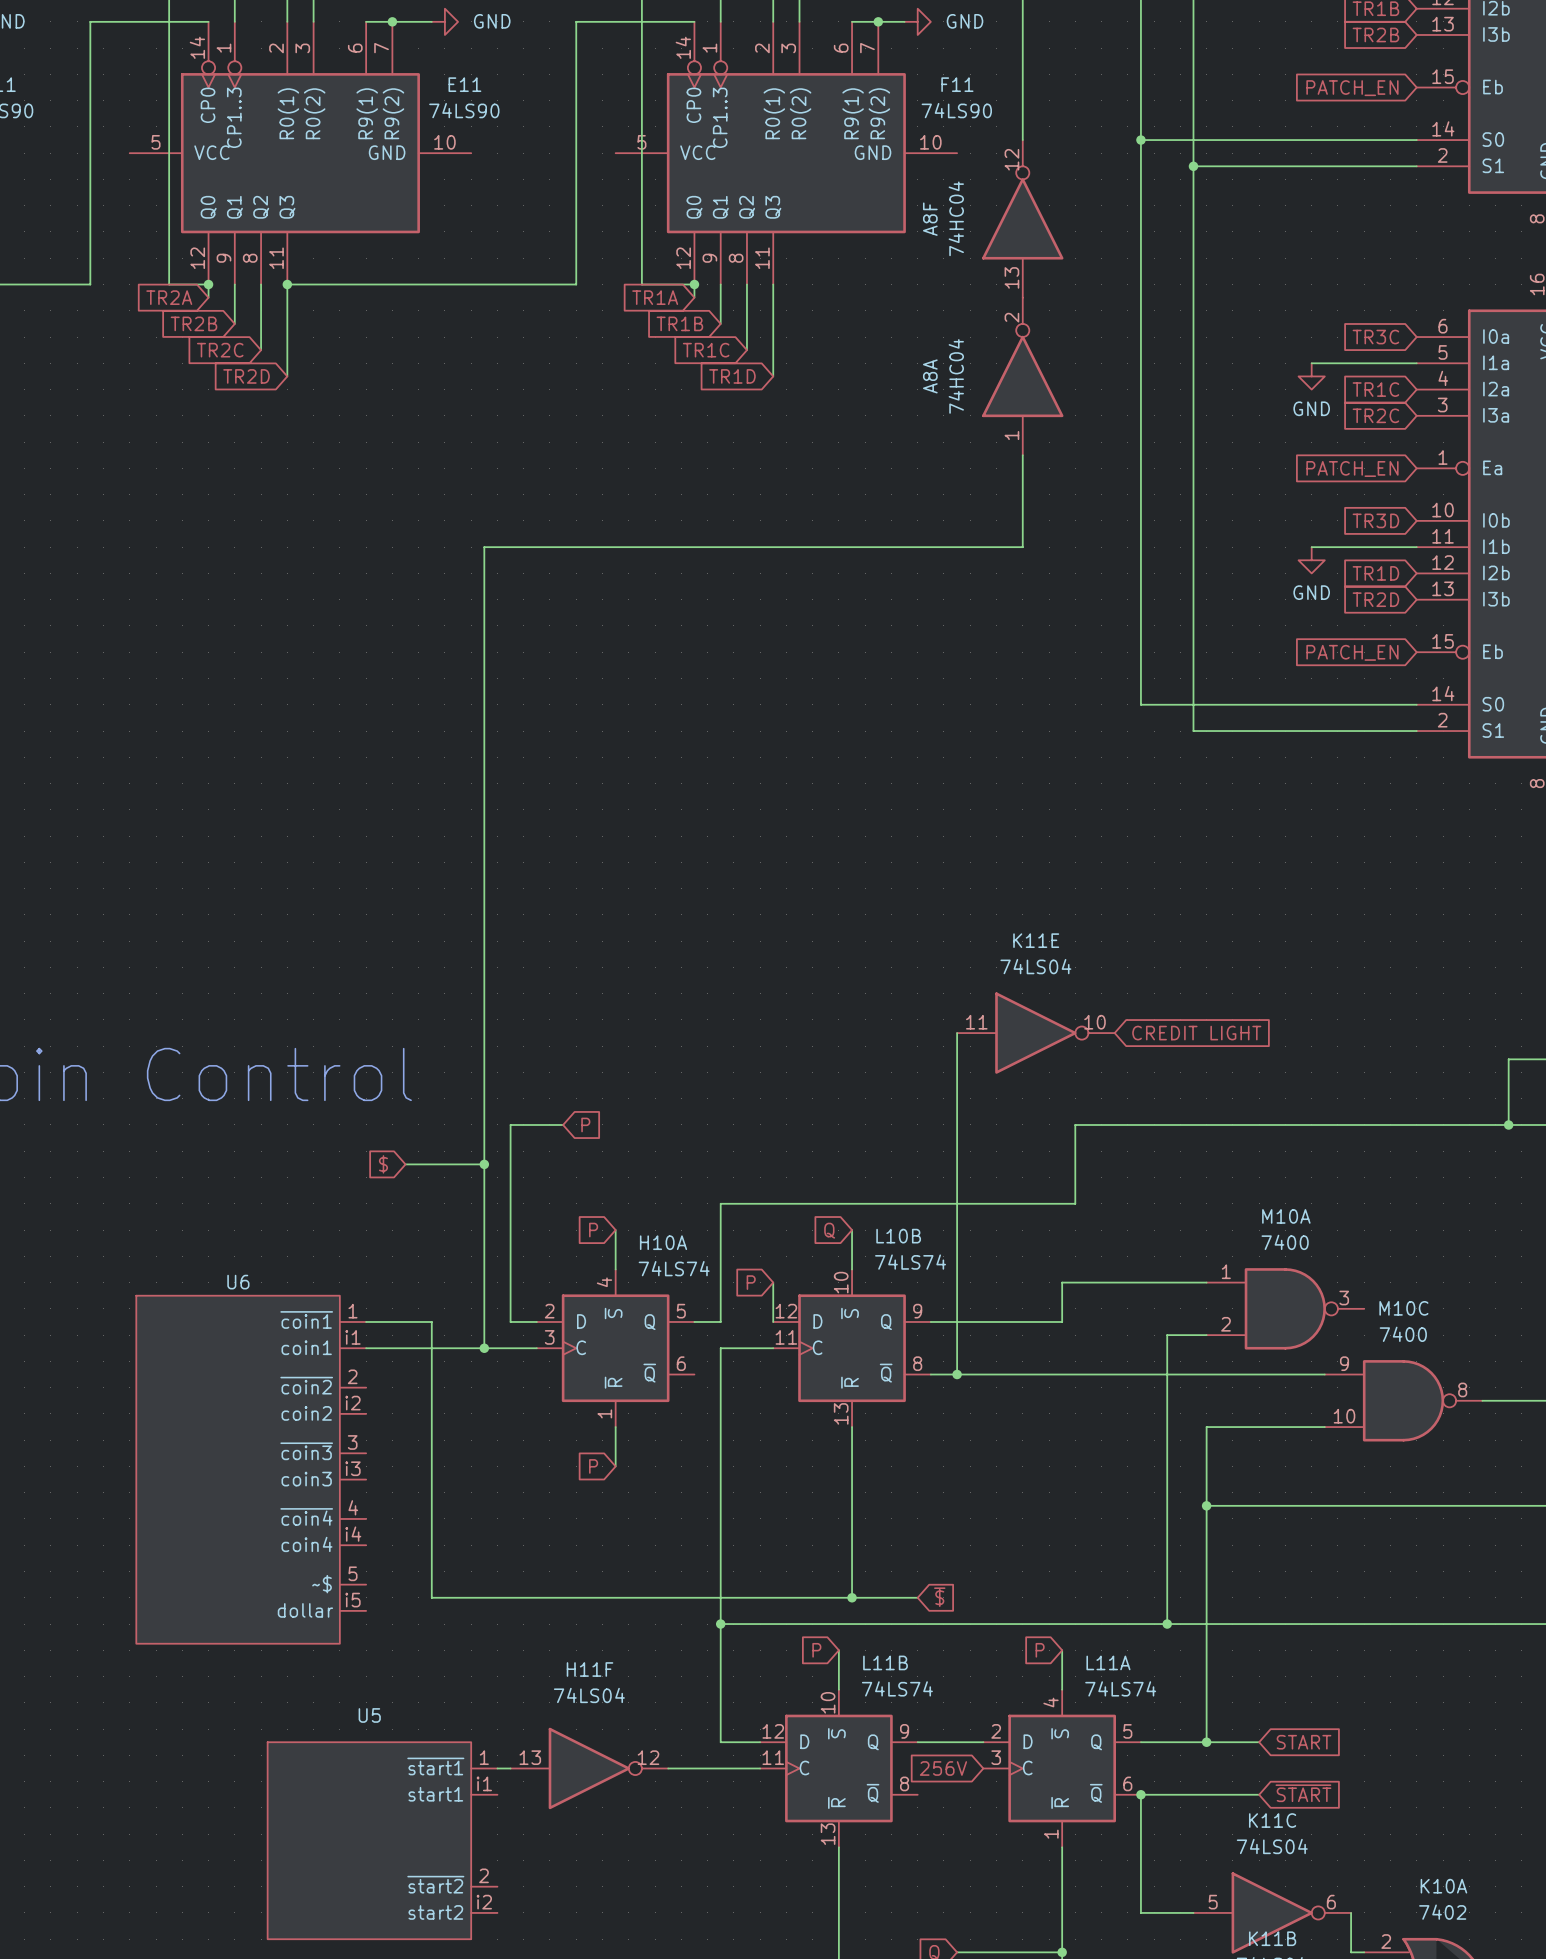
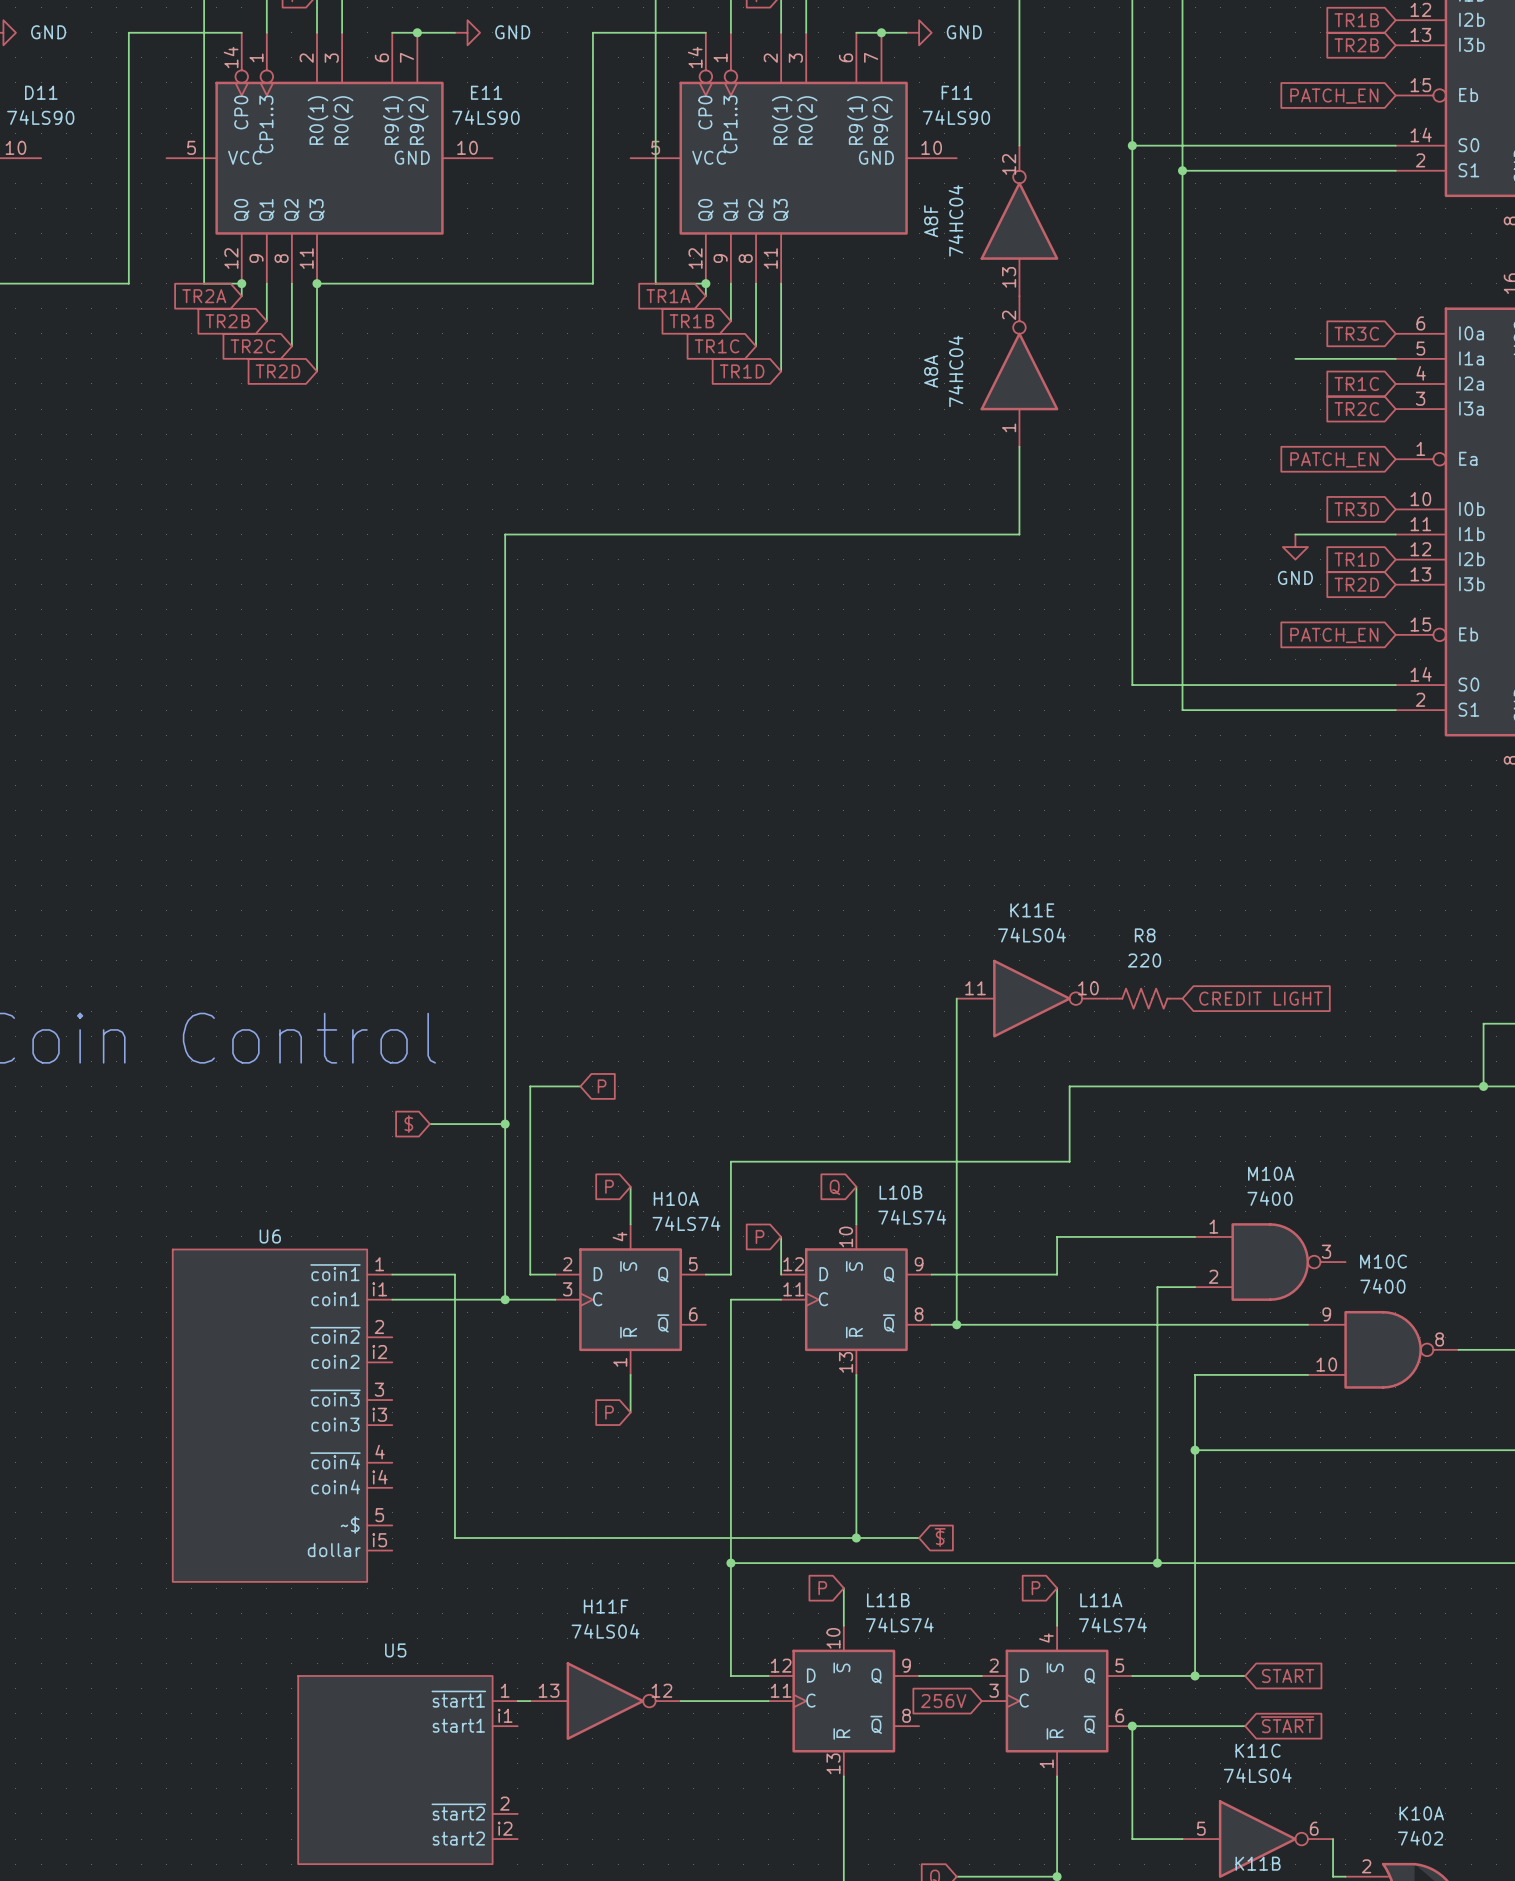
power symbol: GND (1311, 376) -> none
R8: none -> 220 (1144, 998)
global label position: CREDIT LIGHT (1196, 1033) -> CREDIT LIGHT (1260, 998)

